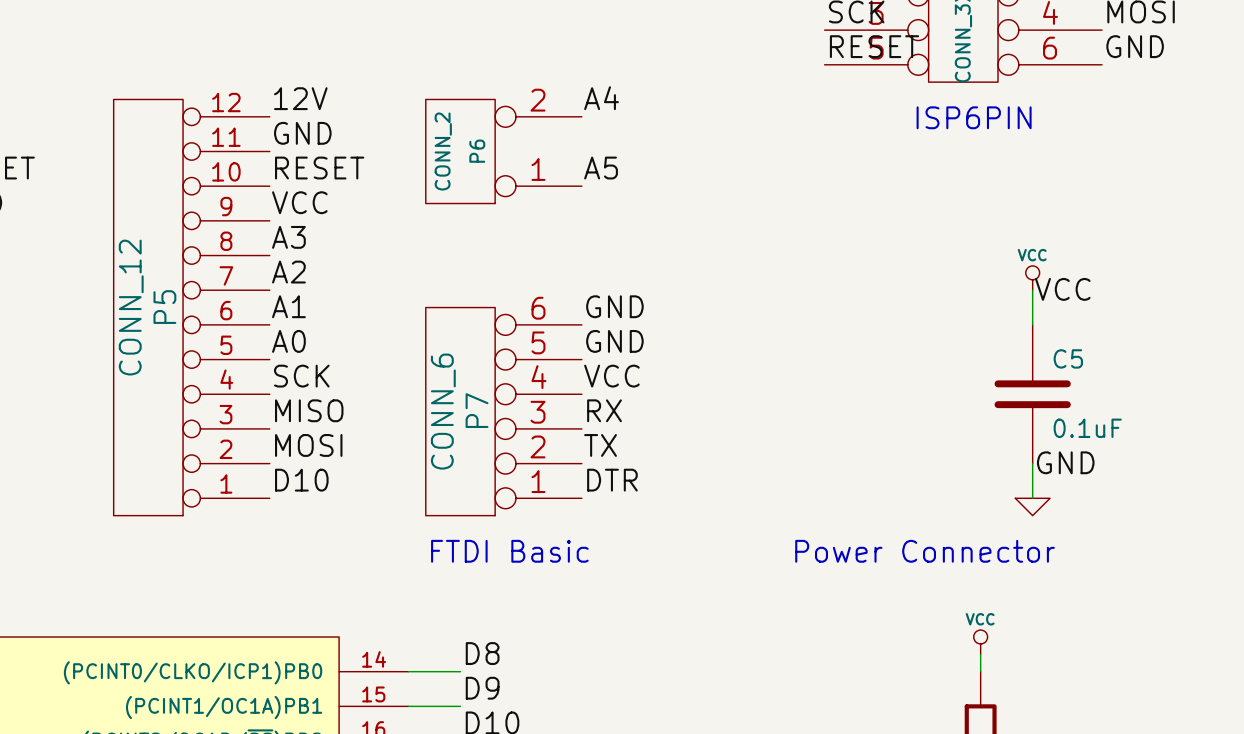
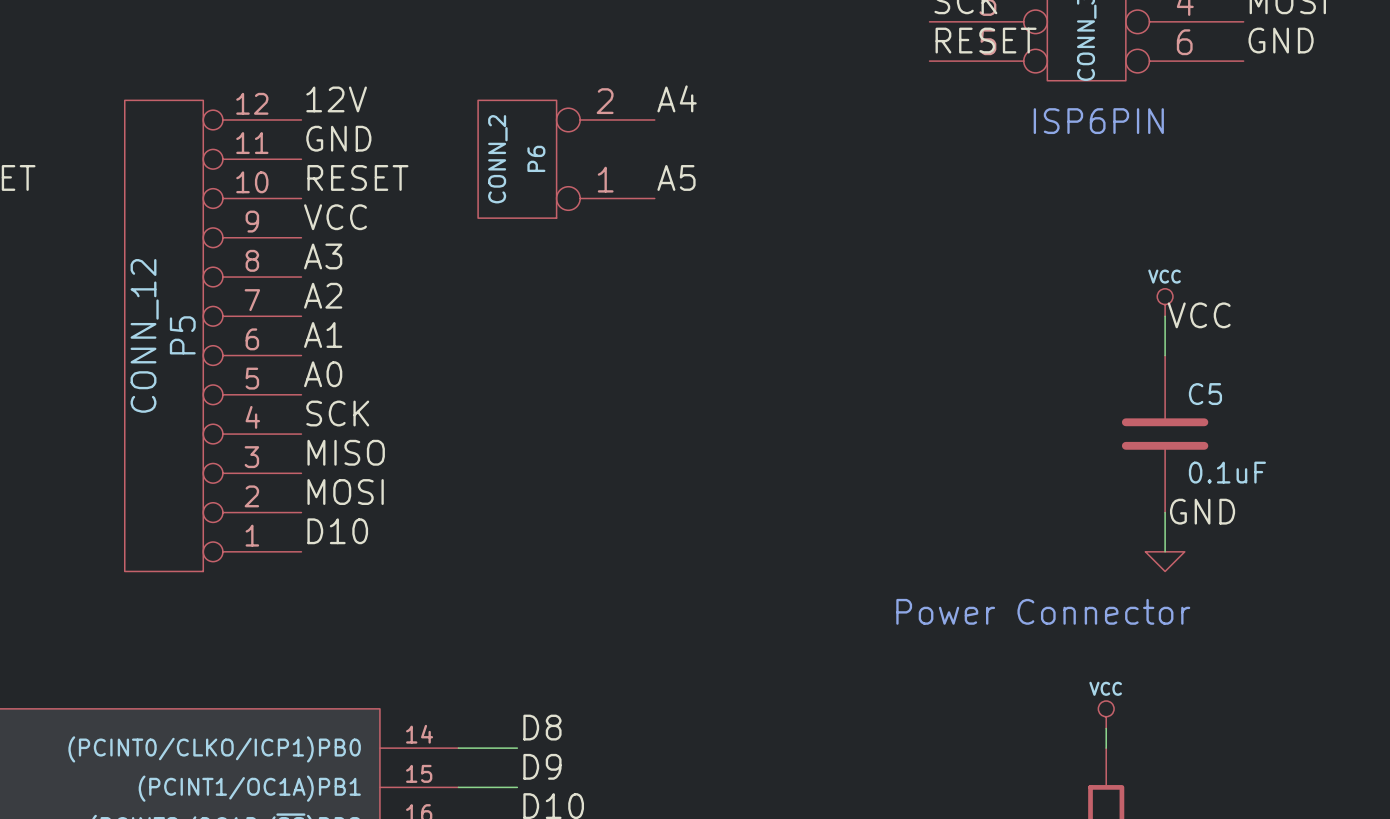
label: GND (614, 306) -> none
label: GND (614, 341) -> none
label: VCC (611, 376) -> none
label: RX (604, 410) -> none
P7: CONN_6 (503, 411) -> none
label: TX (600, 445) -> none
label: DTR (612, 480) -> none
text: FTDI Basic (509, 551) -> none

